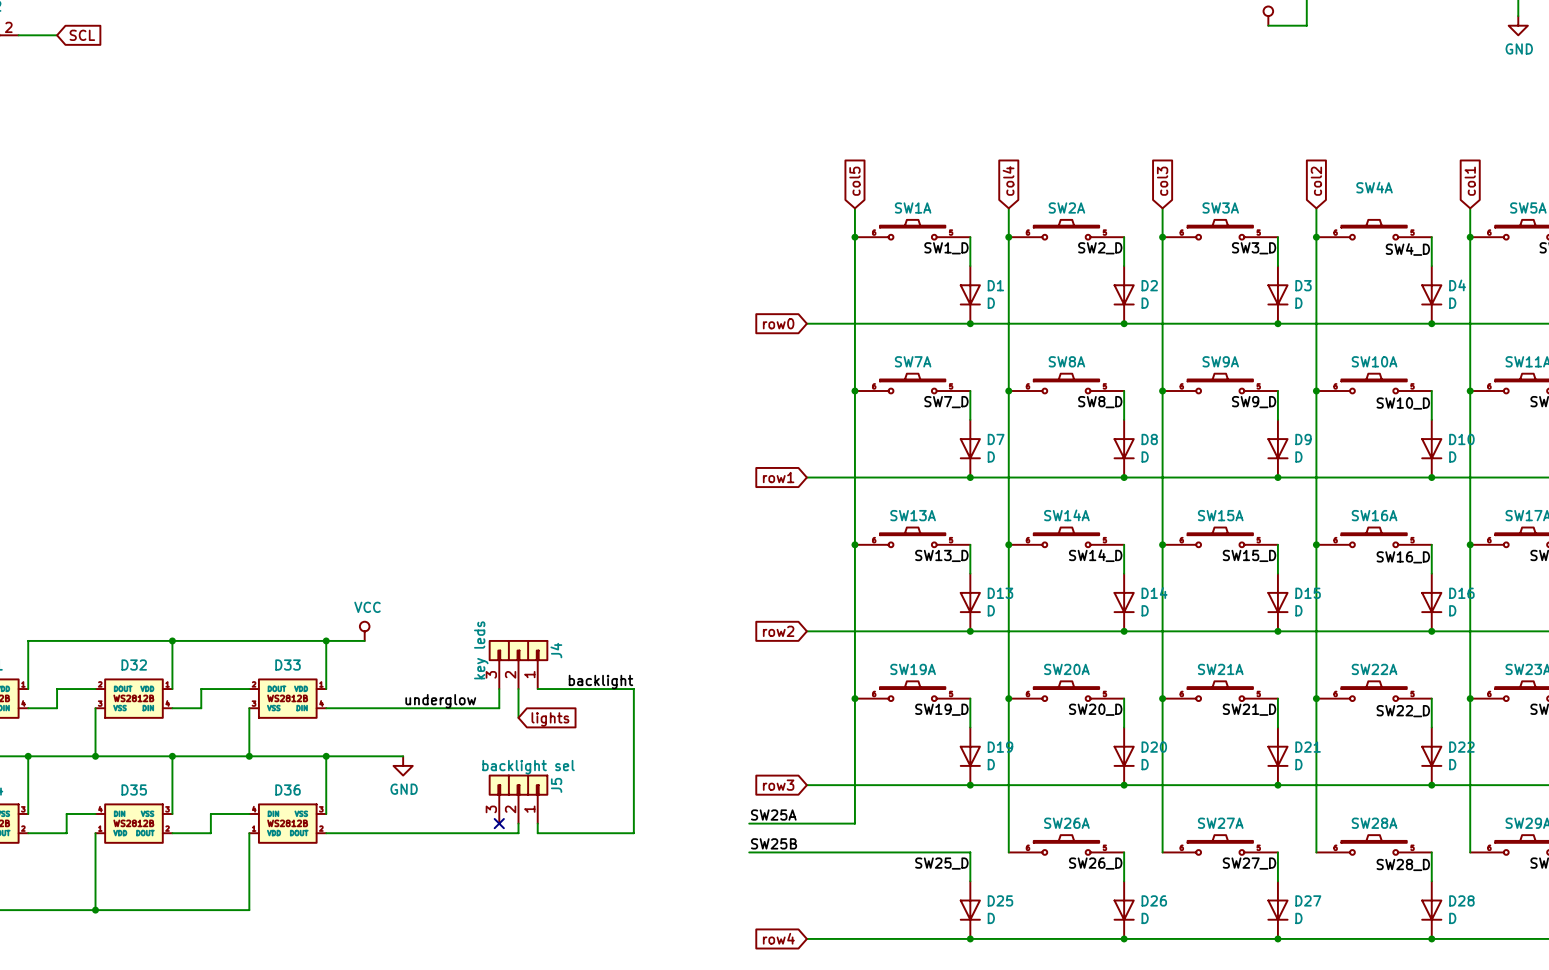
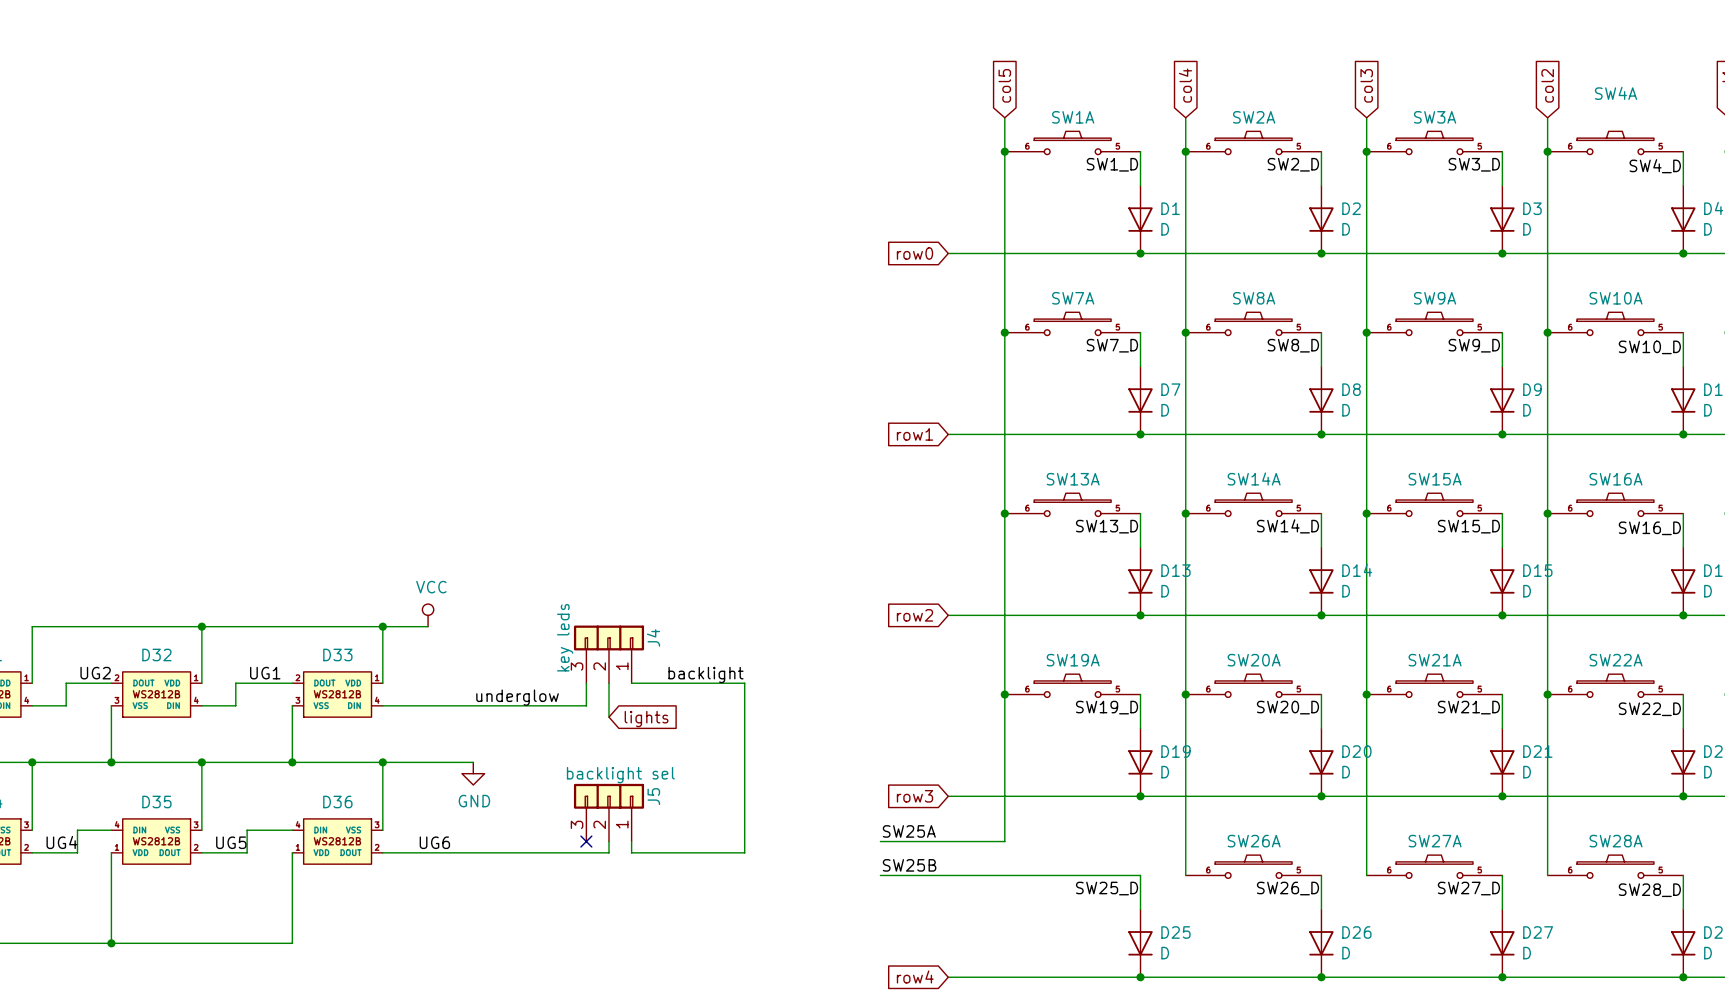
label: none -> UG2 (95, 673)
label: none -> UG1 (265, 673)
label: none -> UG4 (61, 842)
label: none -> UG5 (231, 842)
label: none -> UG6 (434, 842)

